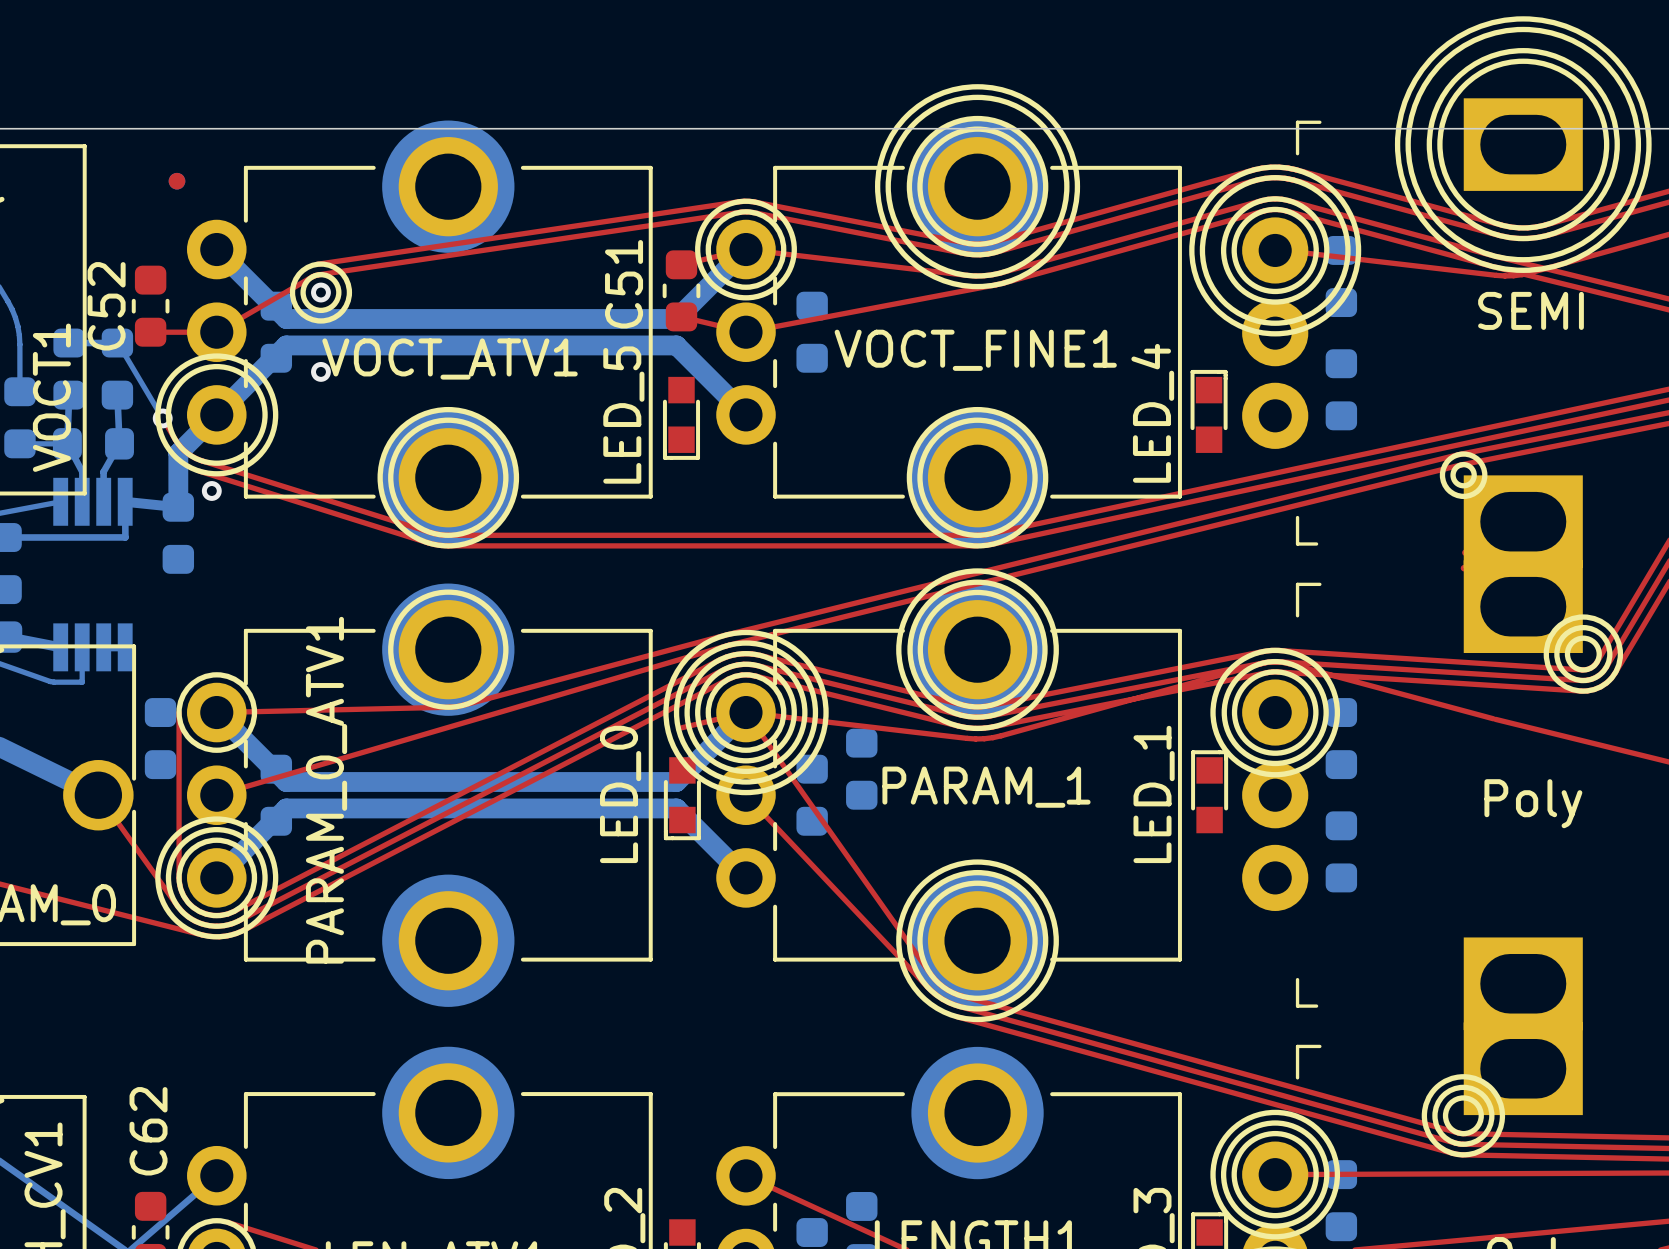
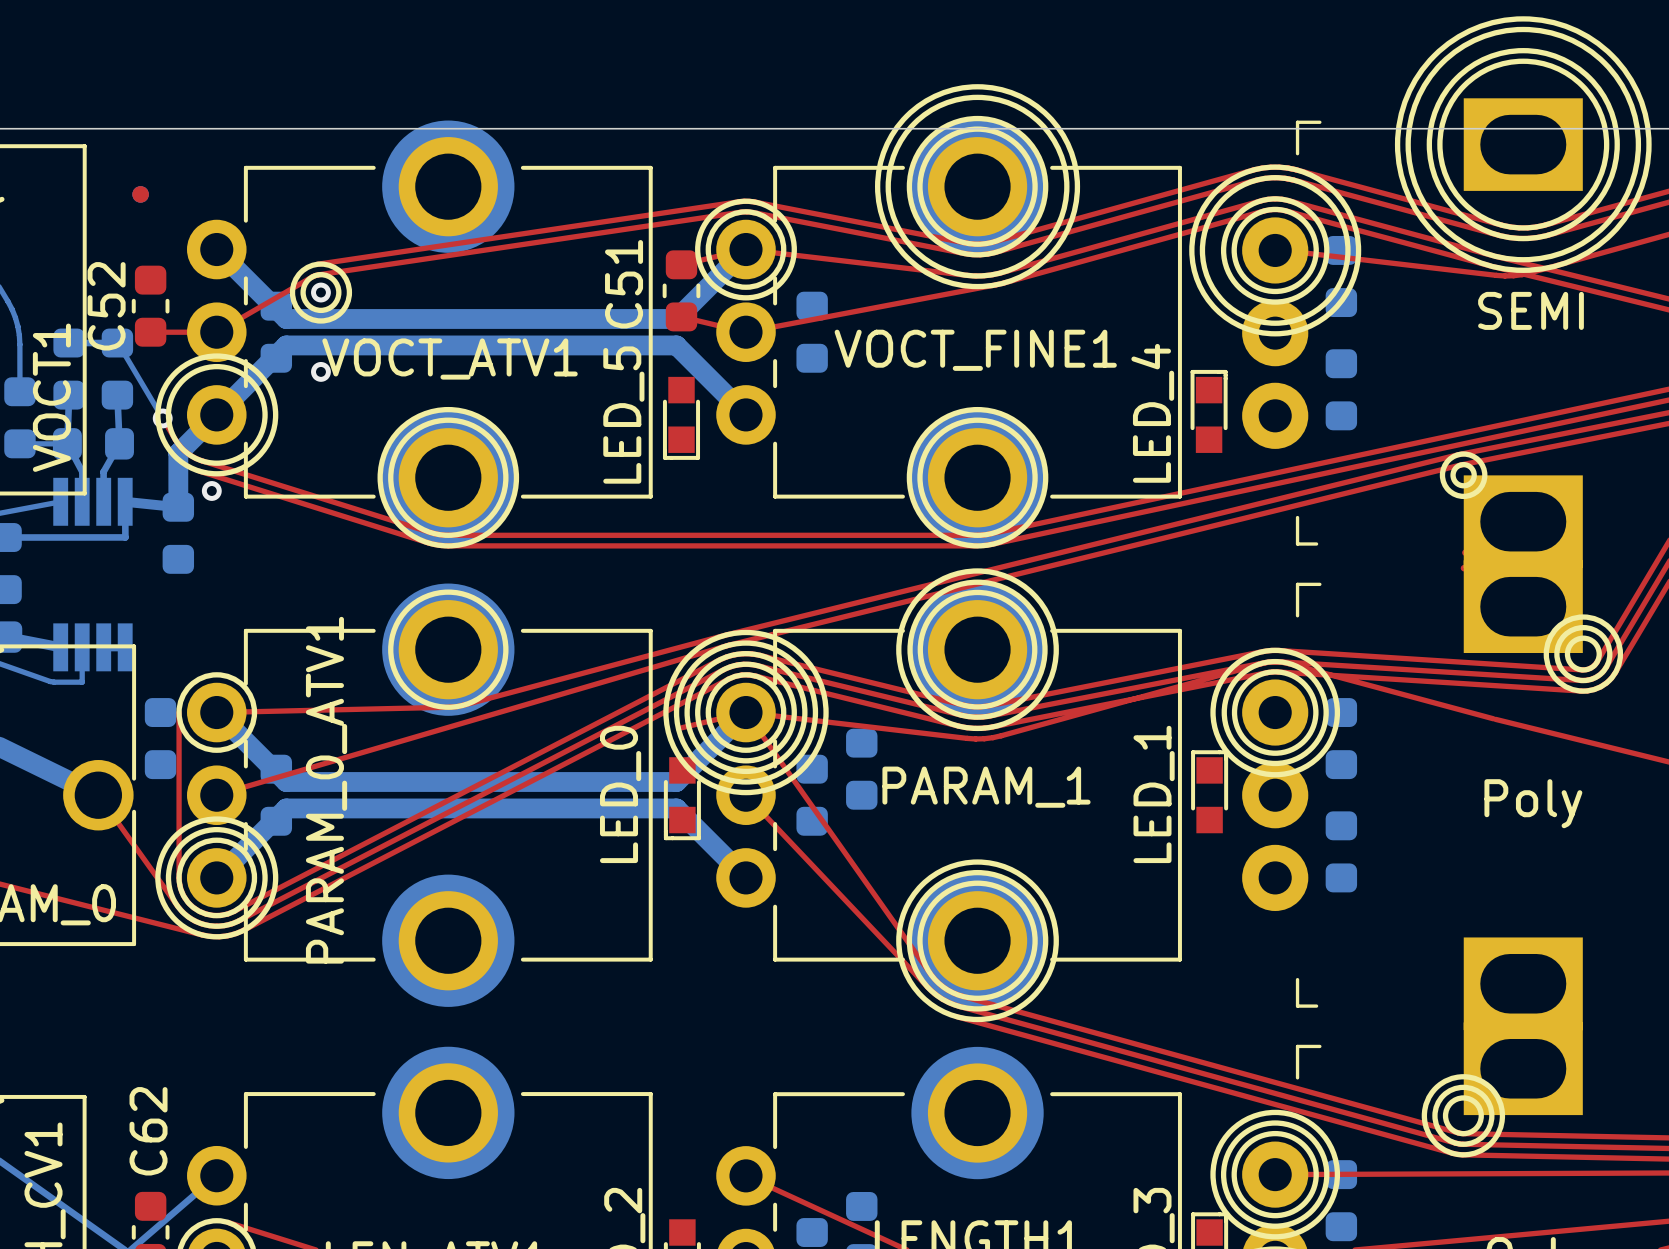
part position: (177, 181) -> (140, 194)

